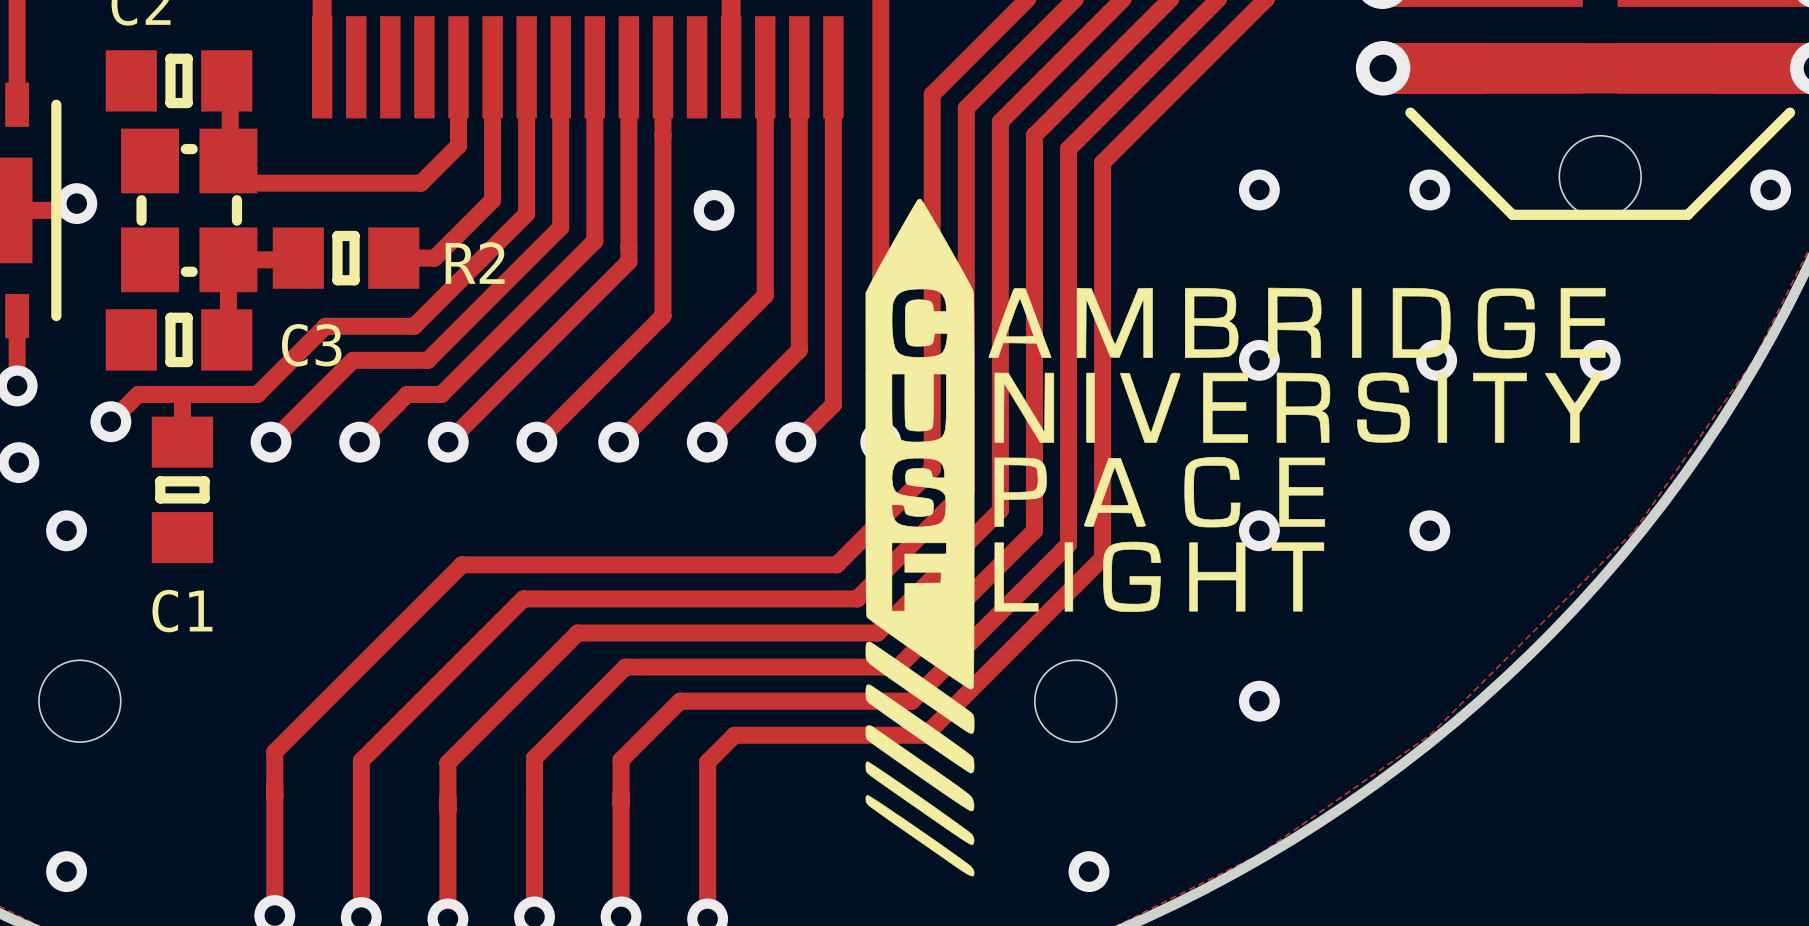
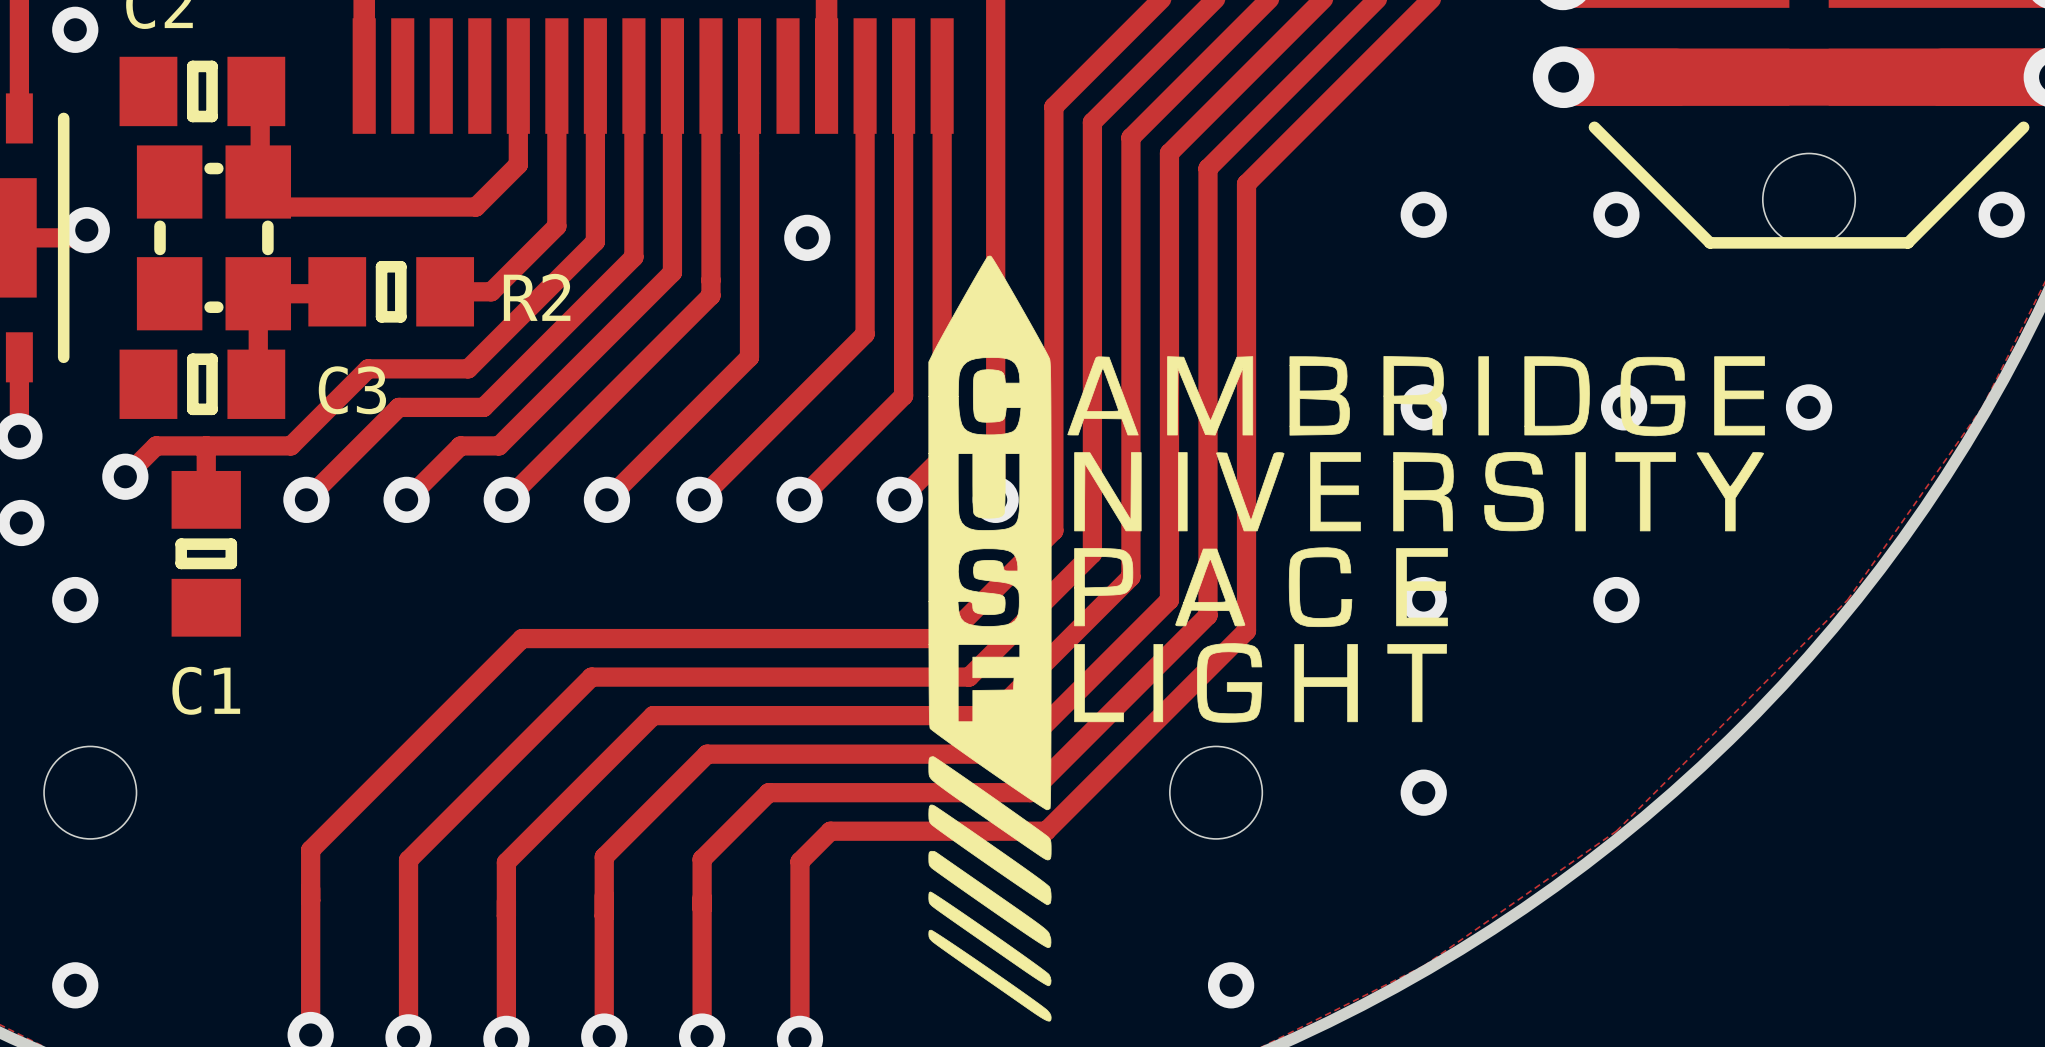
via: none -> (75, 29)
drawing position: (1235, 537) -> (1346, 638)

